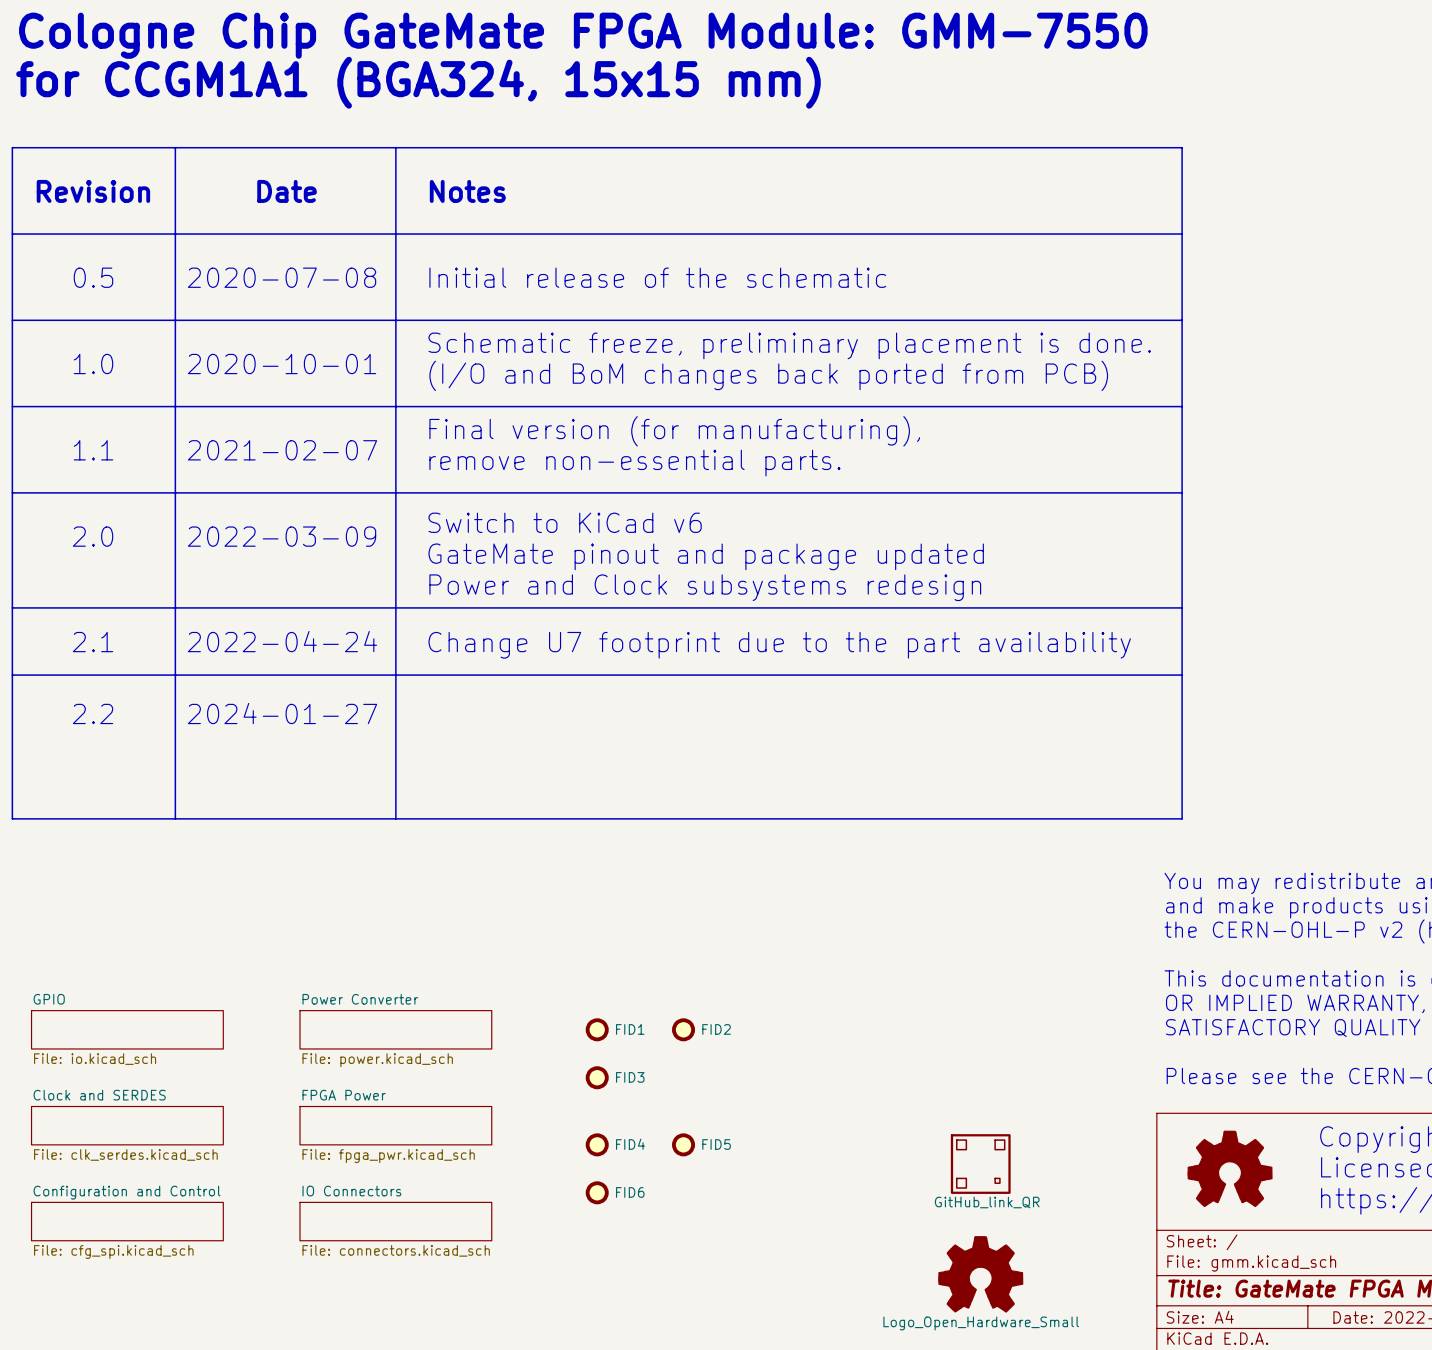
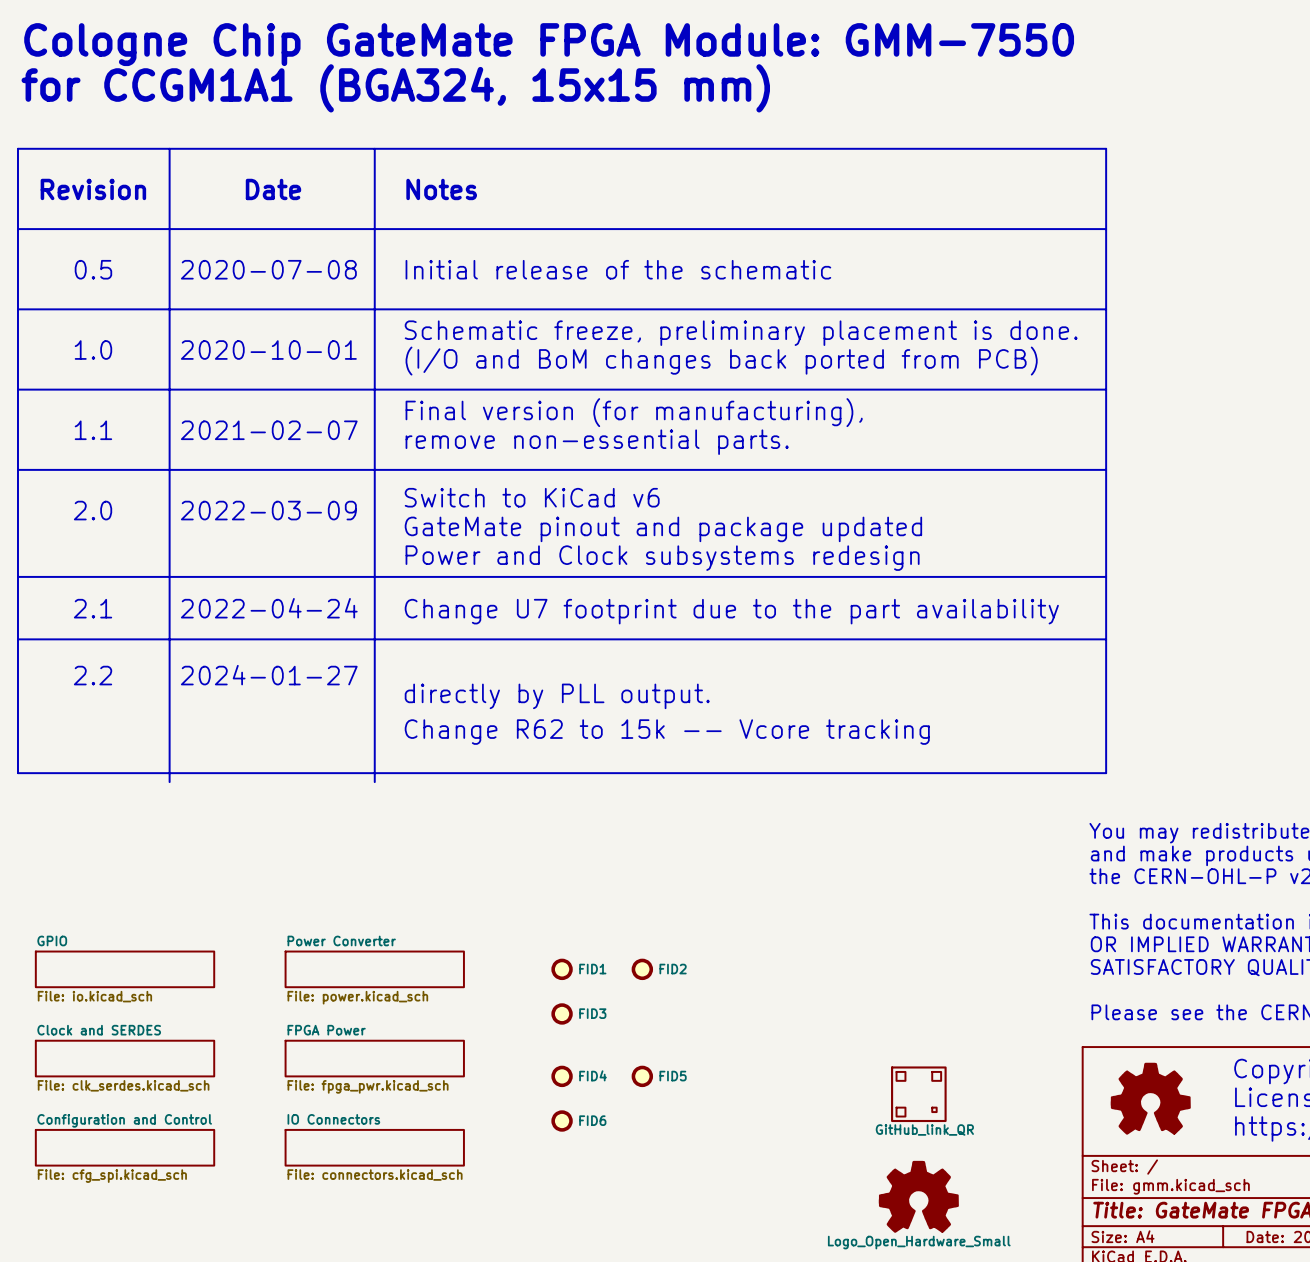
text: none -> directly by PLL output. (557, 696)
text: none -> Change R62 to 15k -- Vcore tracking (667, 732)
line: none -> (169, 773) (169, 782)
line: none -> (374, 773) (374, 782)

